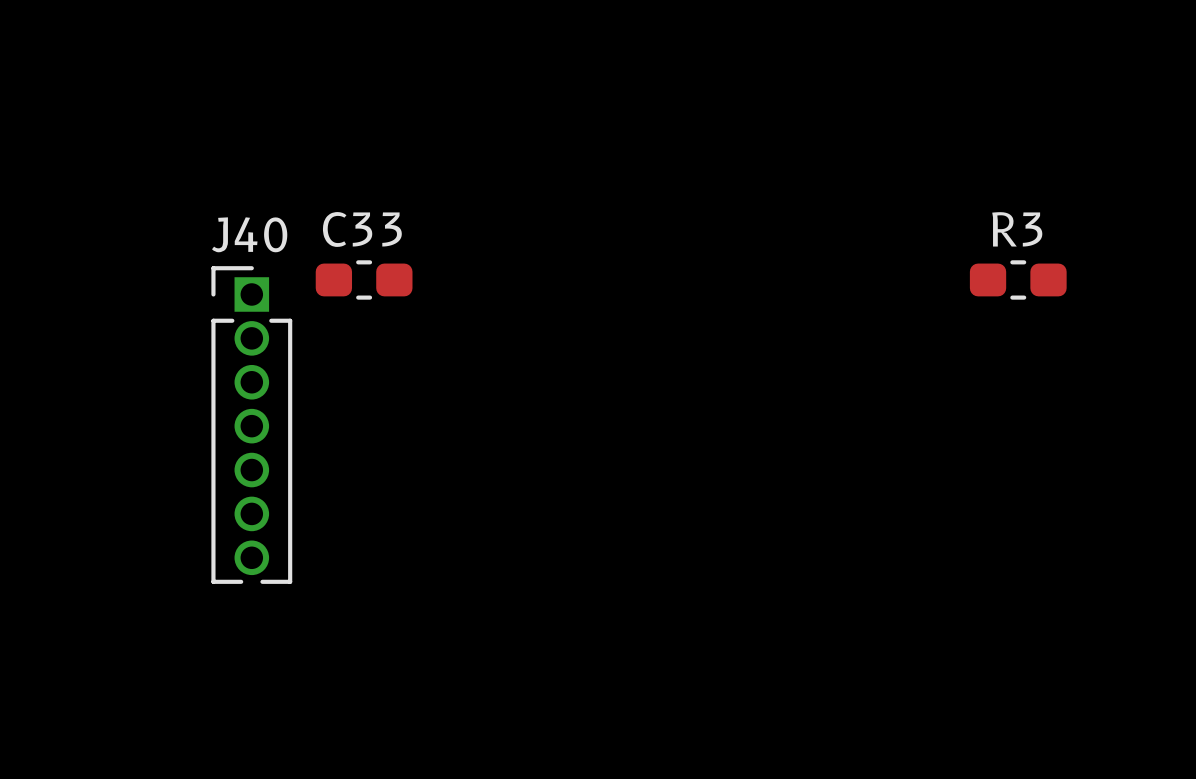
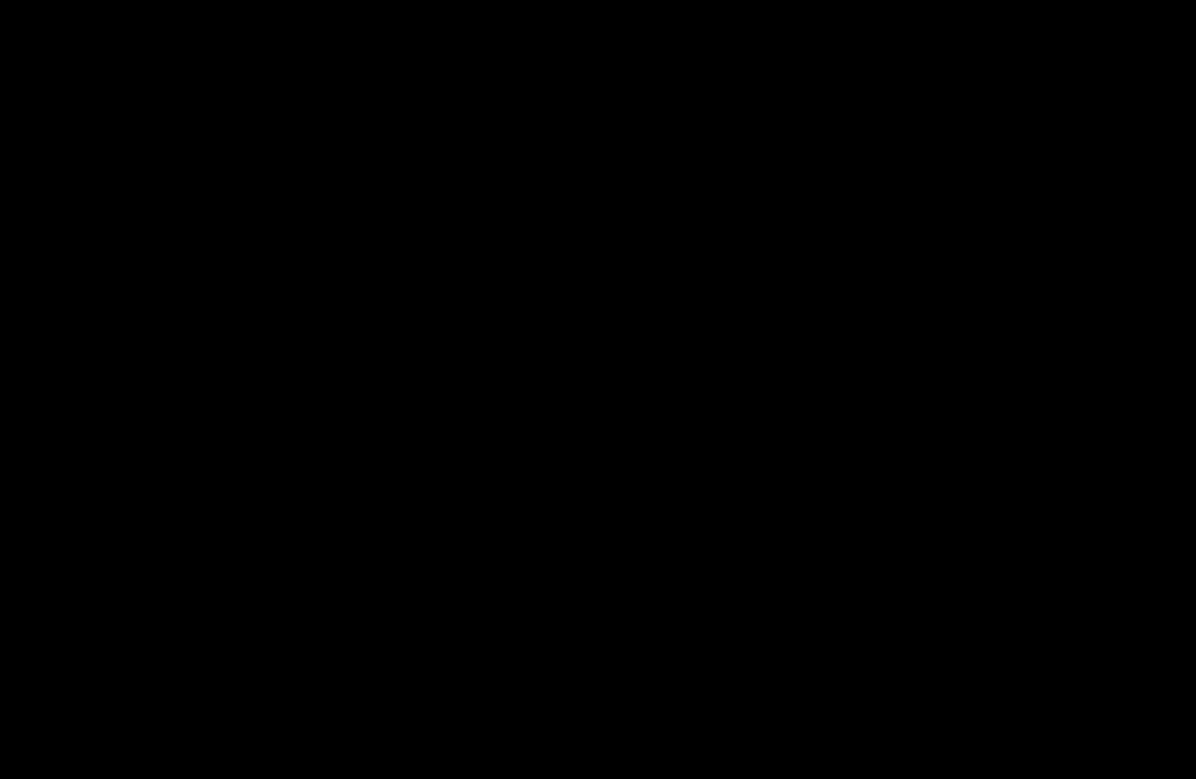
C33: (364, 279) -> none
R3: (1018, 279) -> none
J40: (251, 425) -> none

